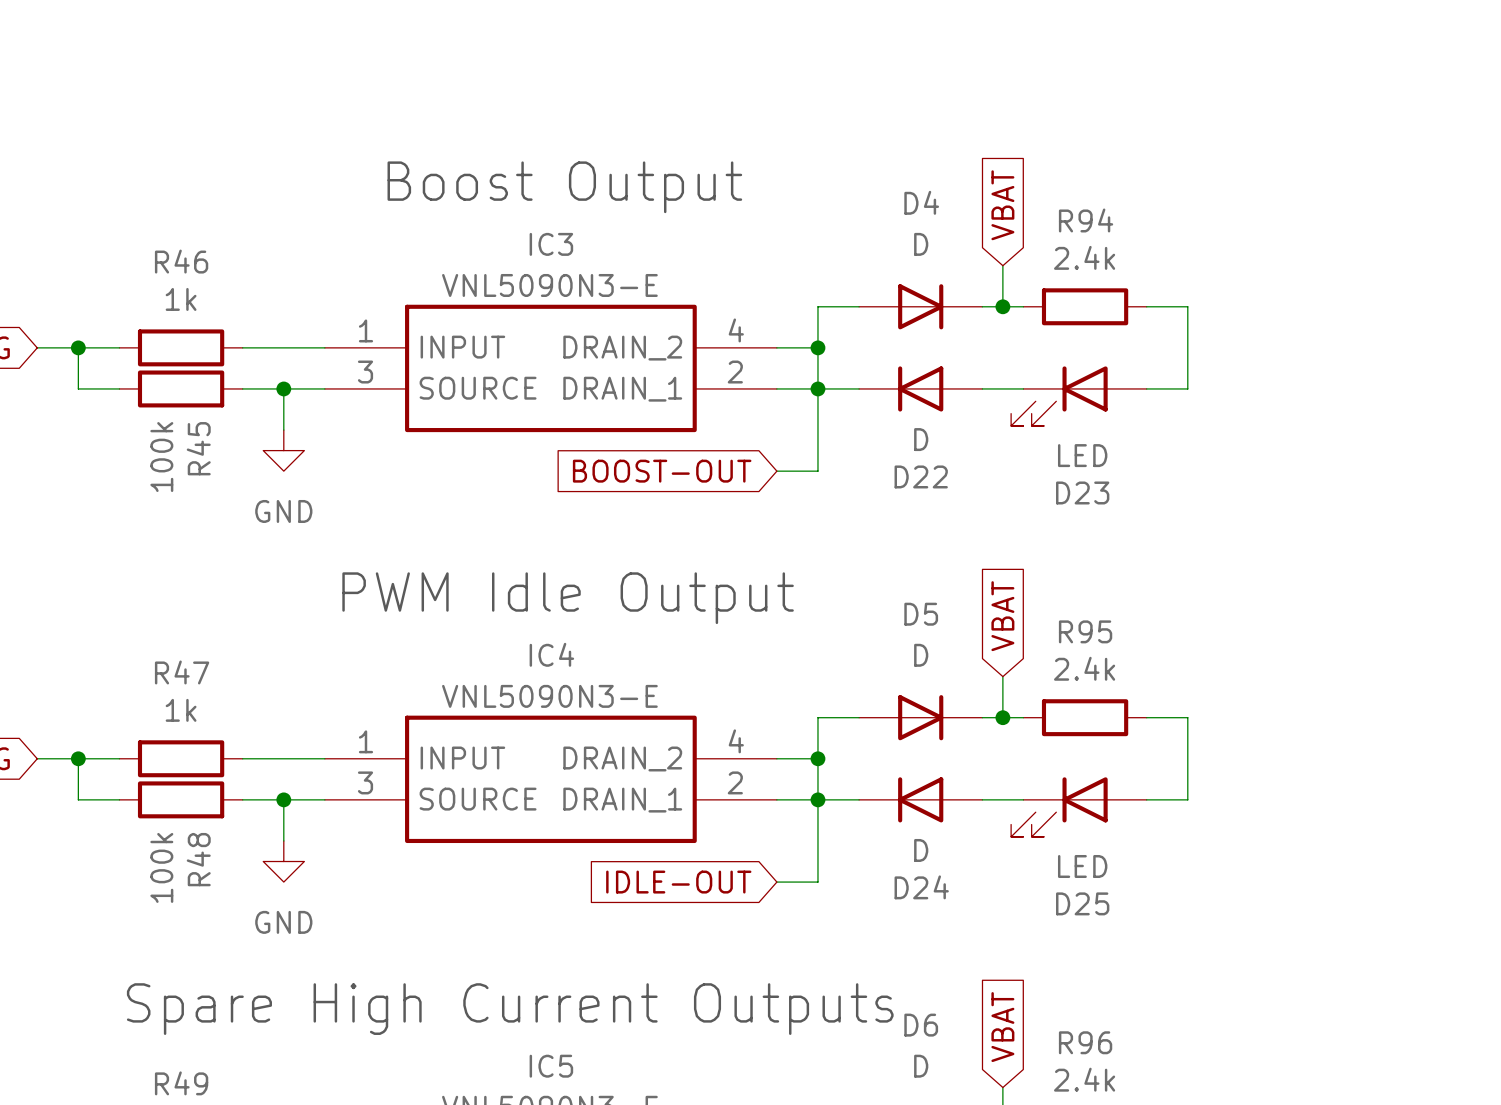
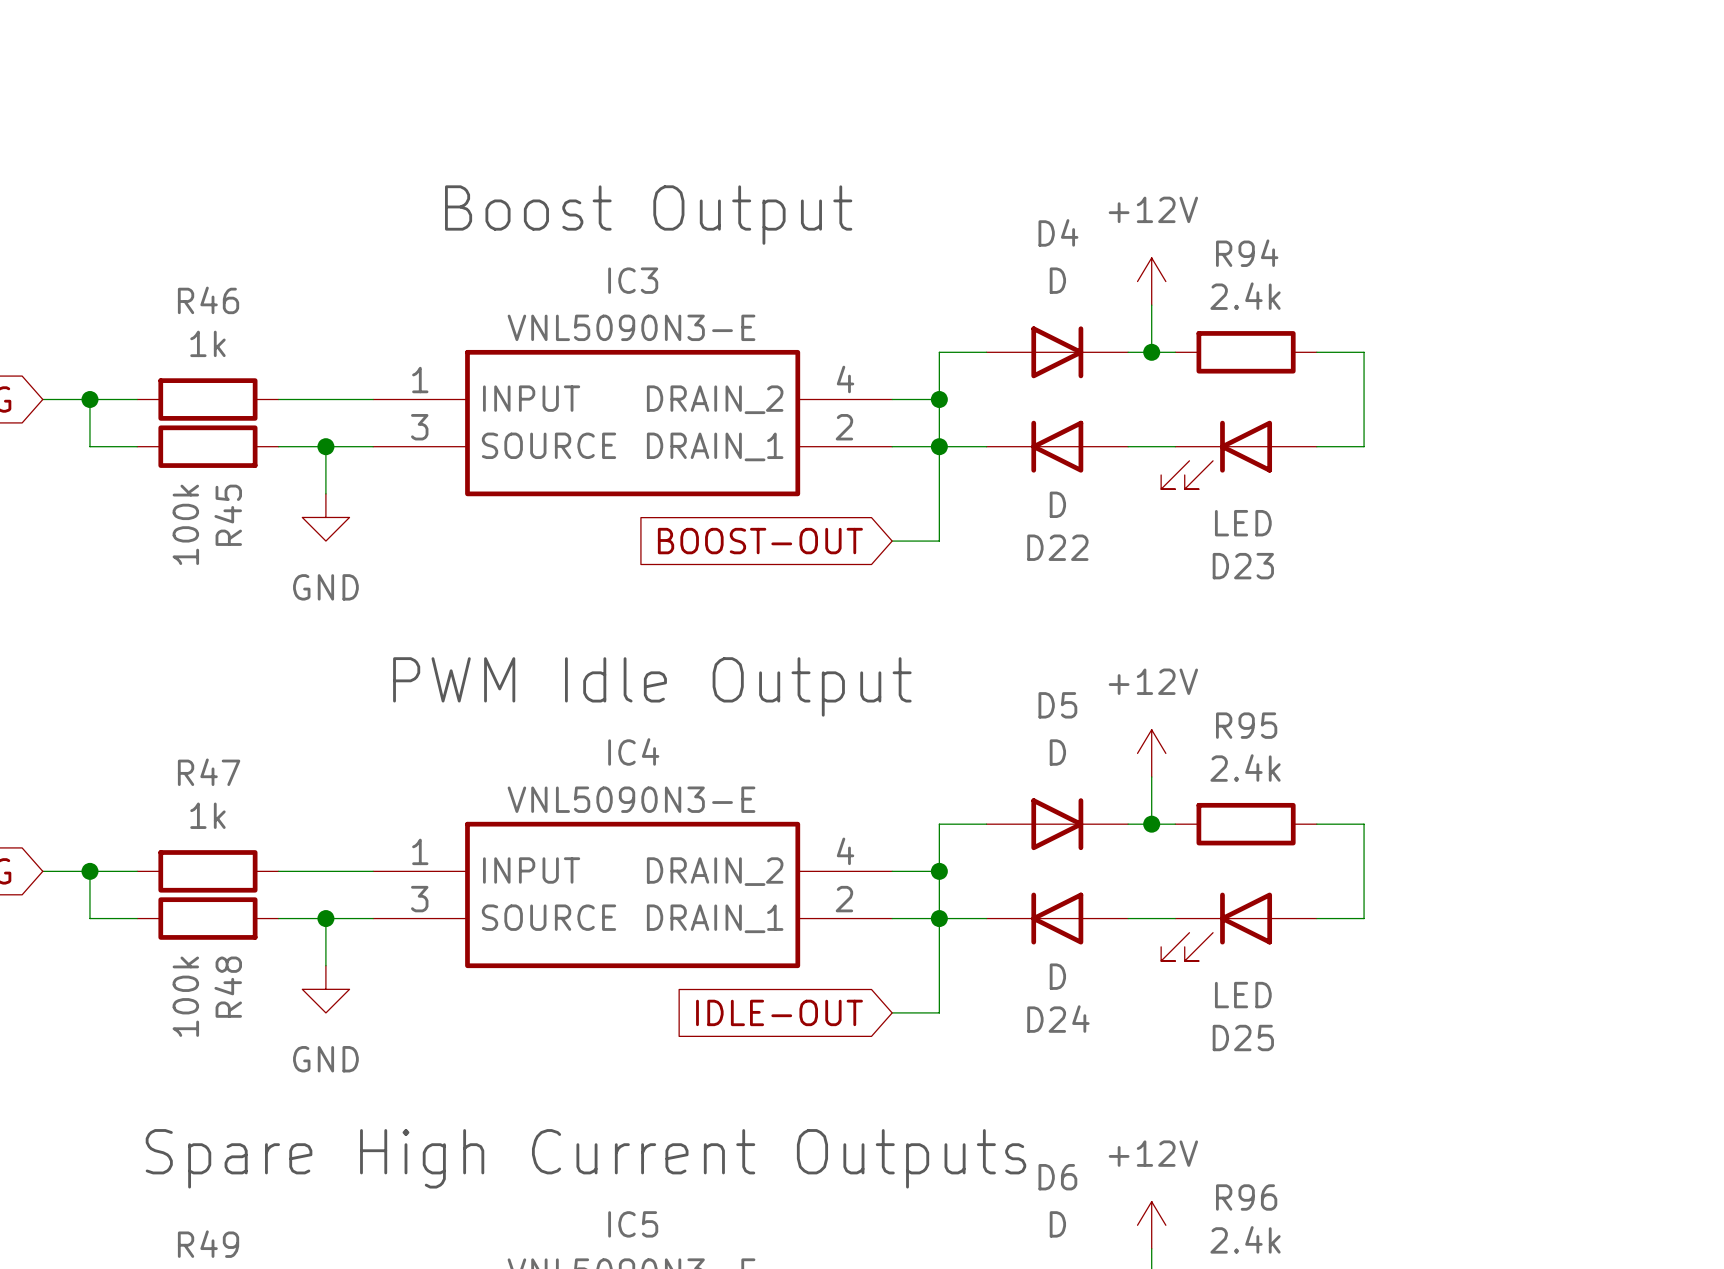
global label: VBAT (1002, 205) -> none
power symbol: none -> +12V (1151, 281)
global label: VBAT (1002, 616) -> none
power symbol: none -> +12V (1151, 753)
global label: VBAT (1002, 1027) -> none
power symbol: none -> +12V (1151, 1225)

